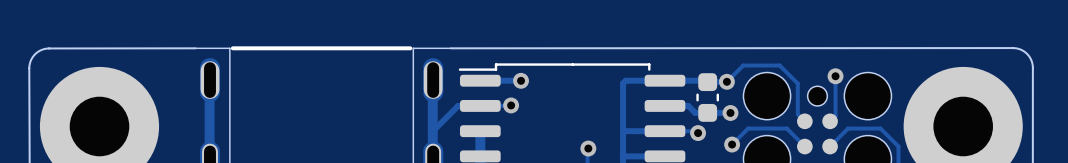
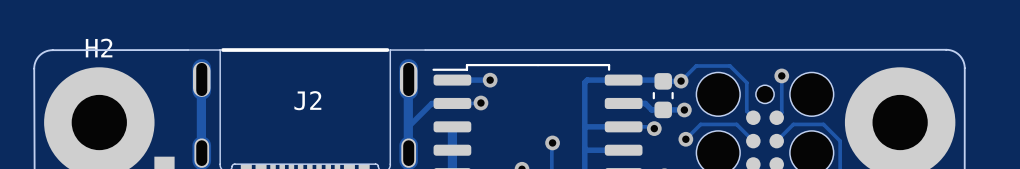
H2 name: none -> H2 (99, 48)
J2 name: none -> J2 (307, 100)

